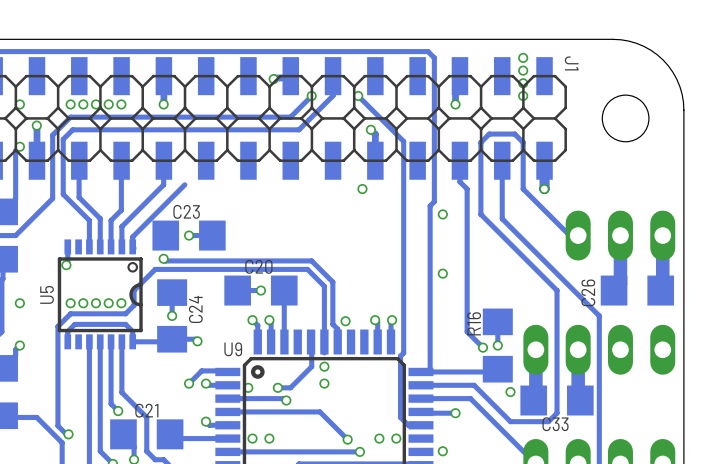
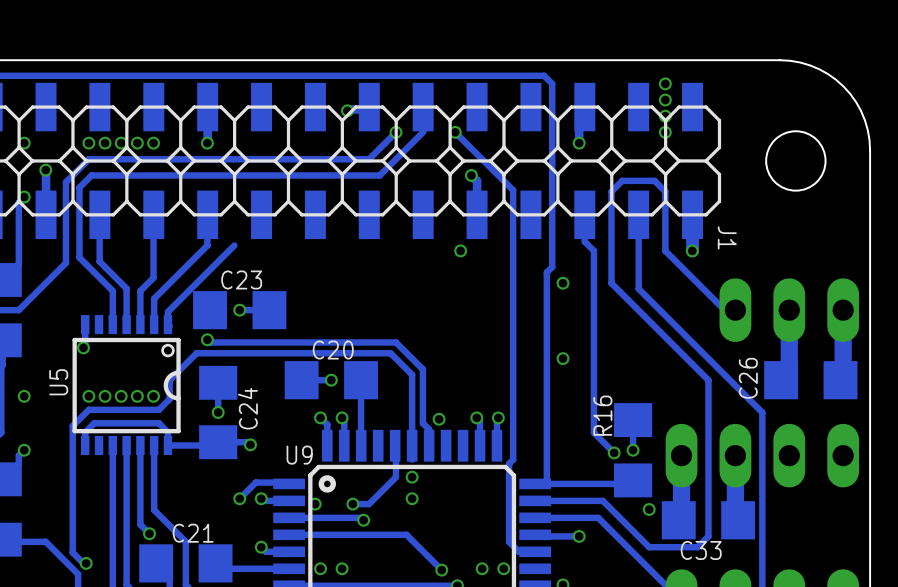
J1 name position: J1 (571, 63) -> J1 (727, 237)

